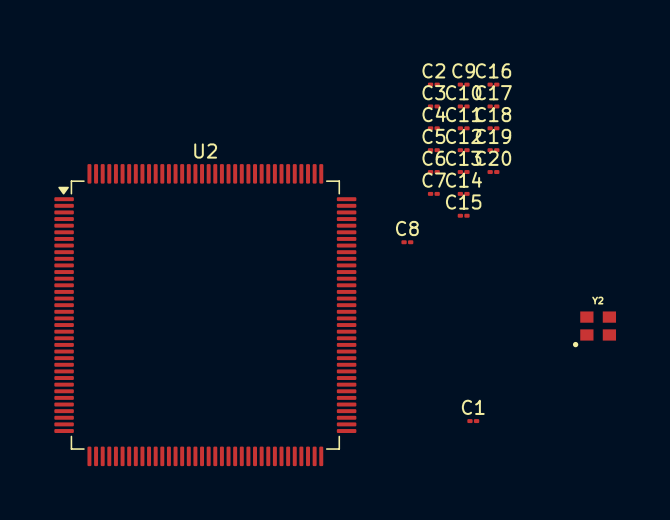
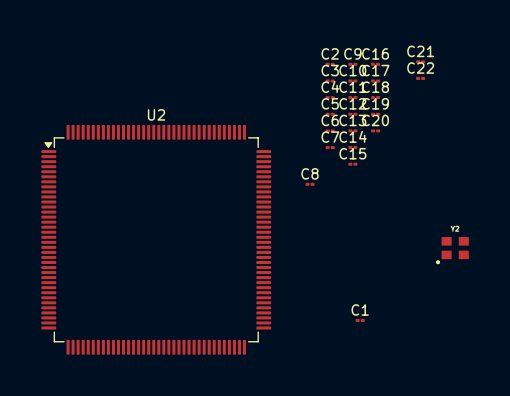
C21: none -> (420, 61)
C22: none -> (420, 78)

